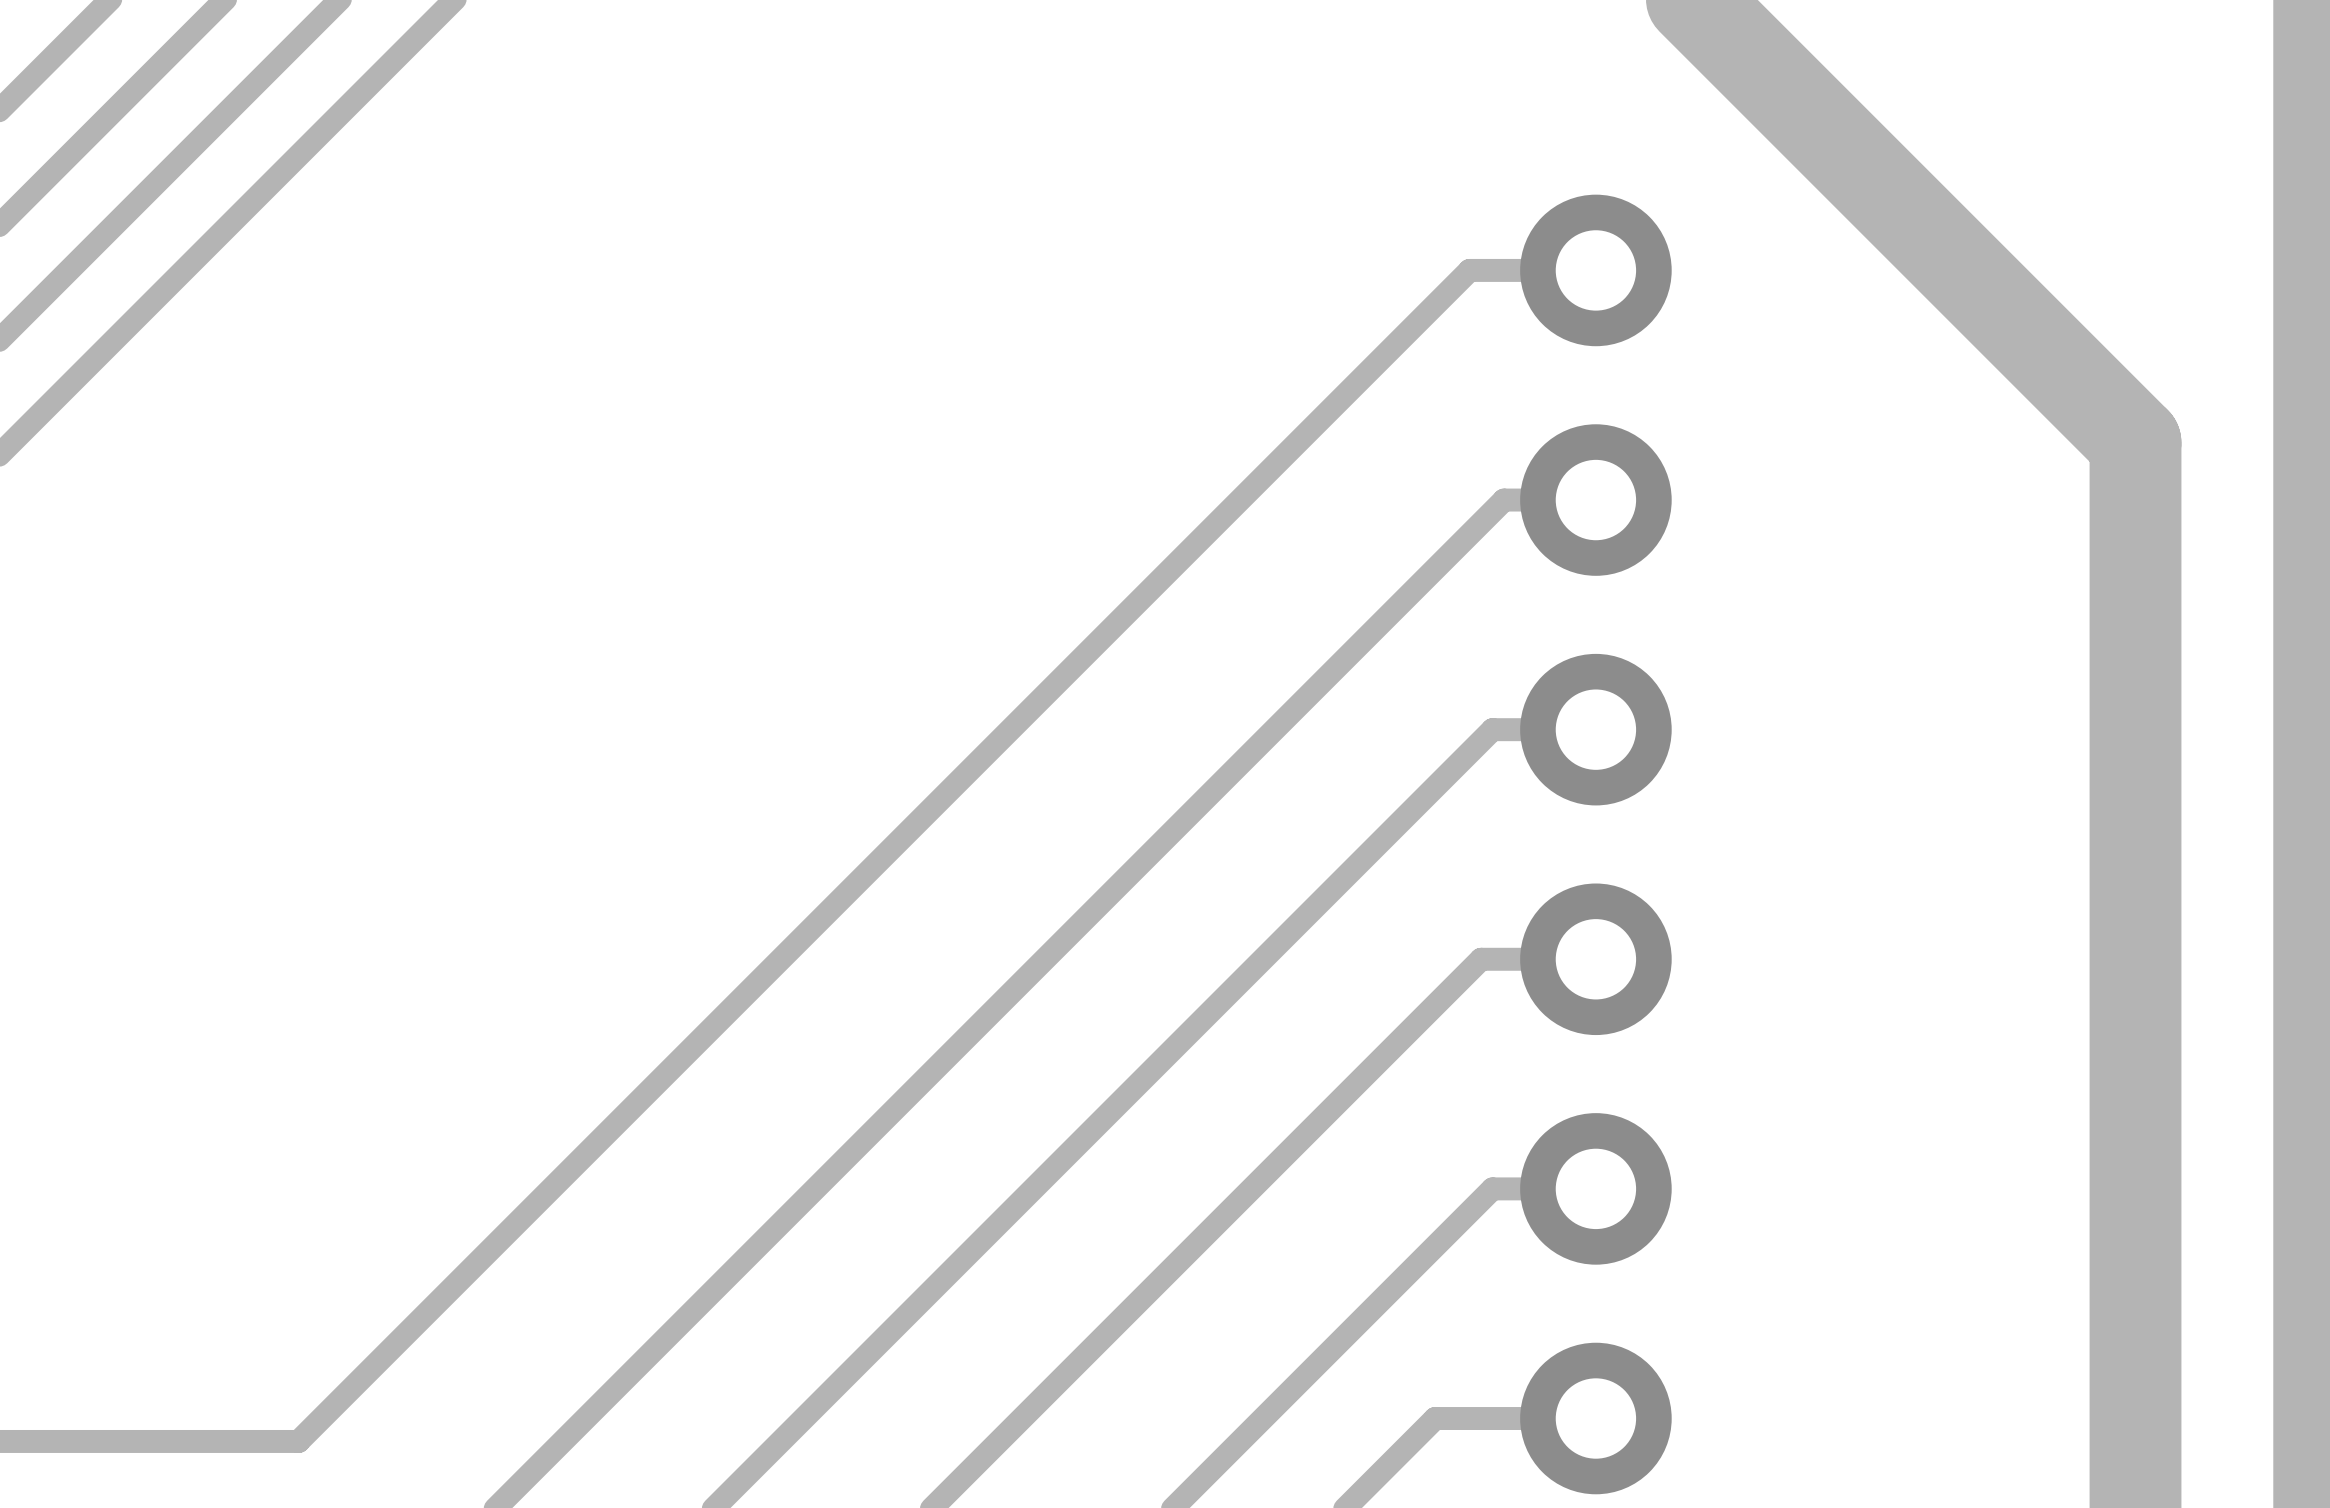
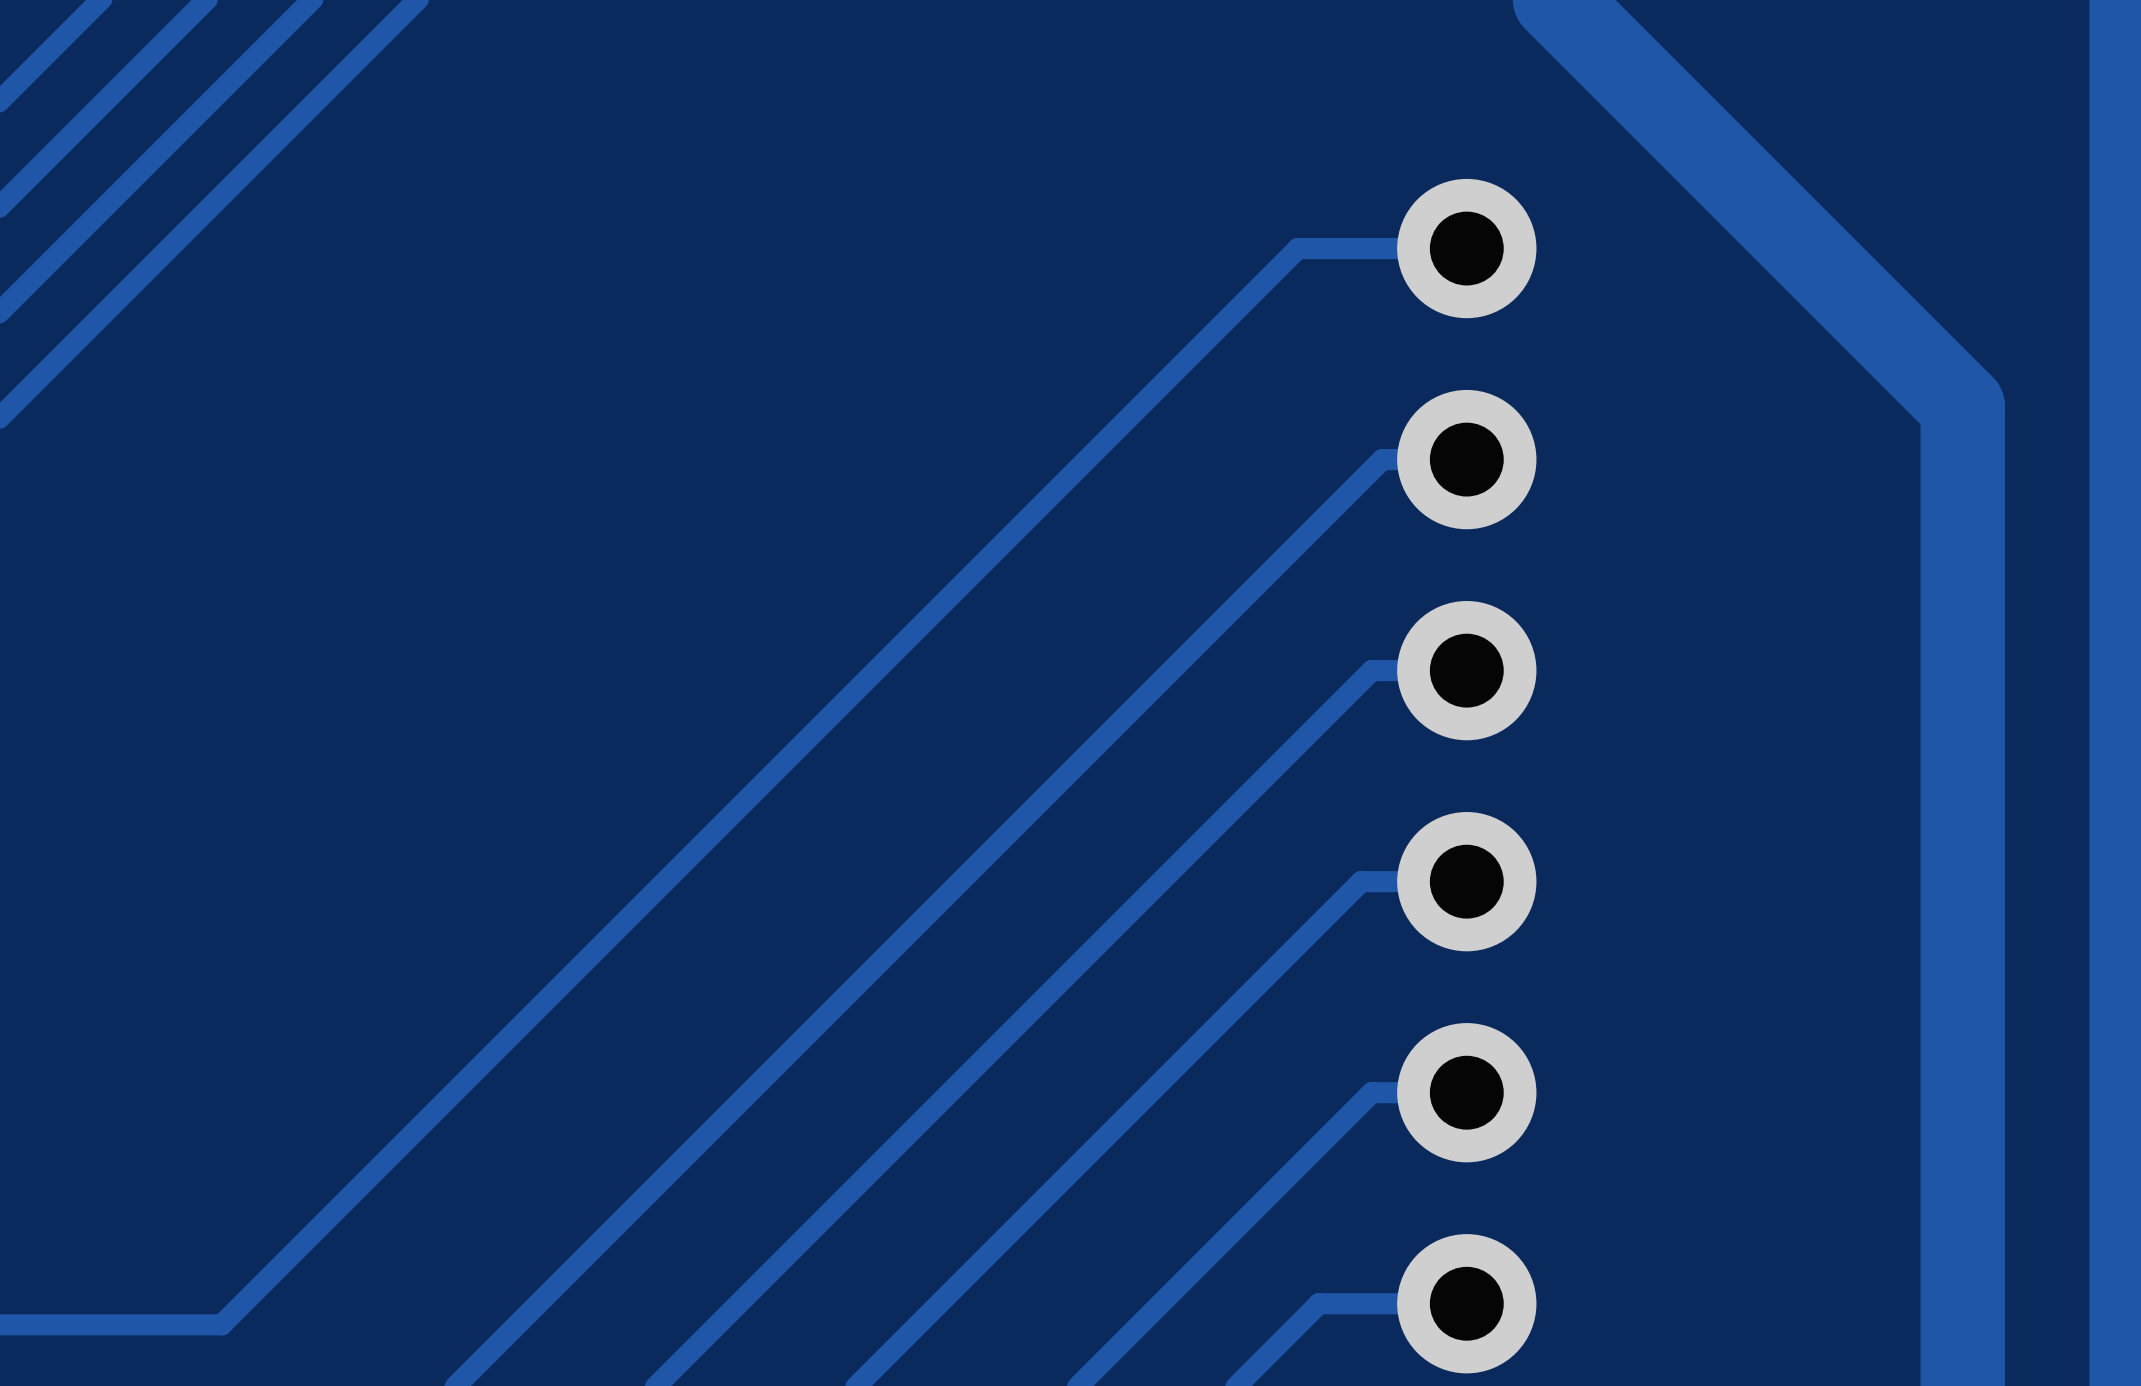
track: (1469, 270) (298, 1441) (241, 1441) -> (1350, 248) (1297, 248) (221, 1324)

